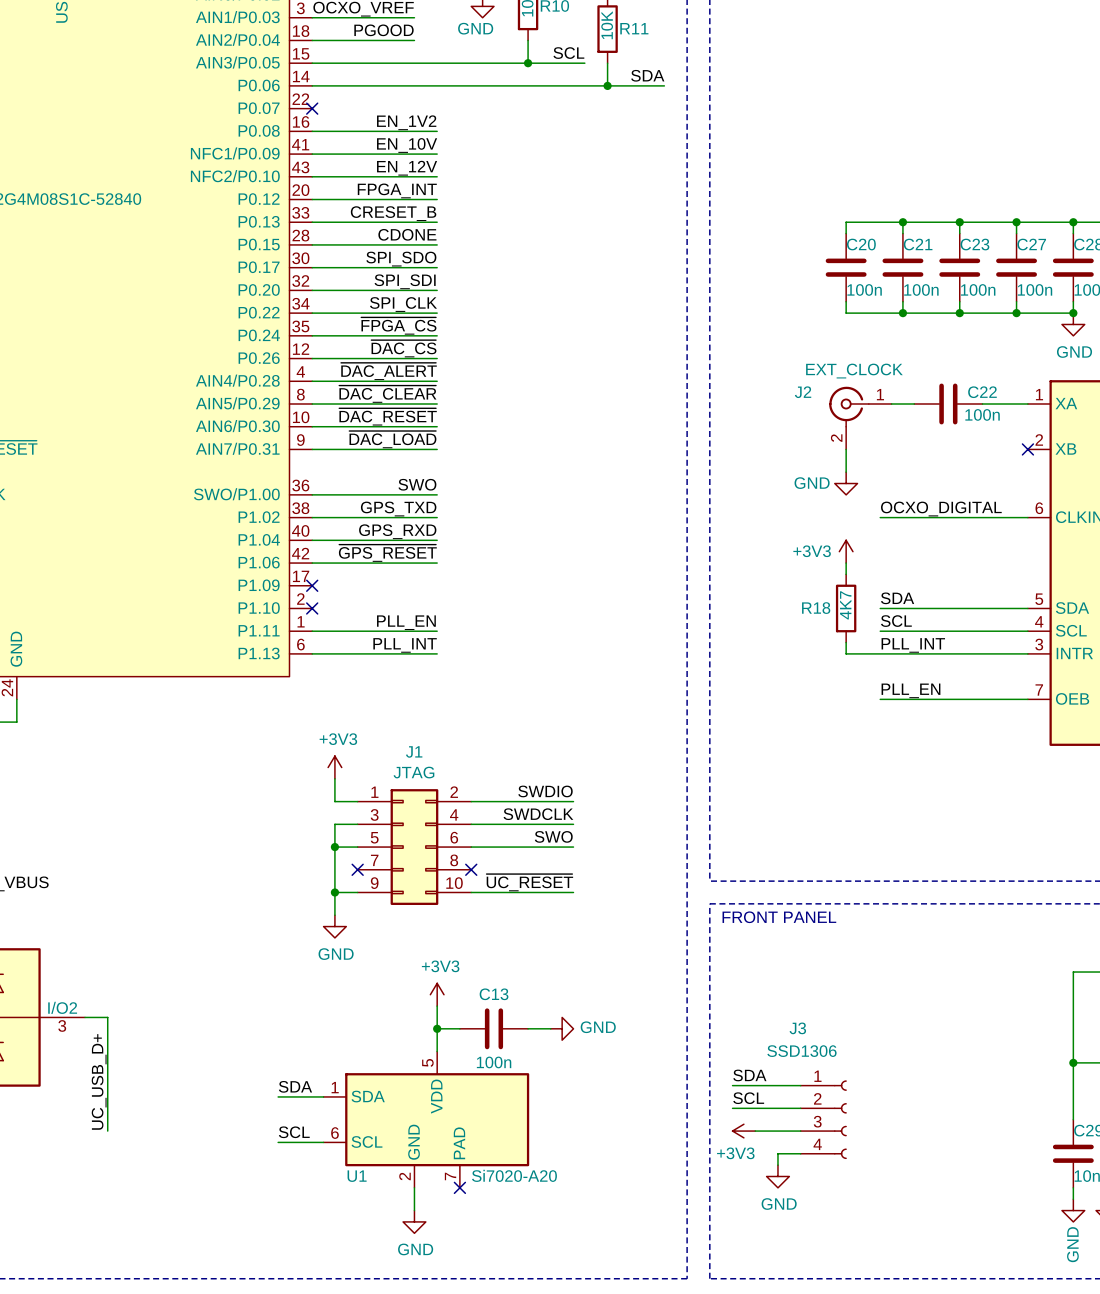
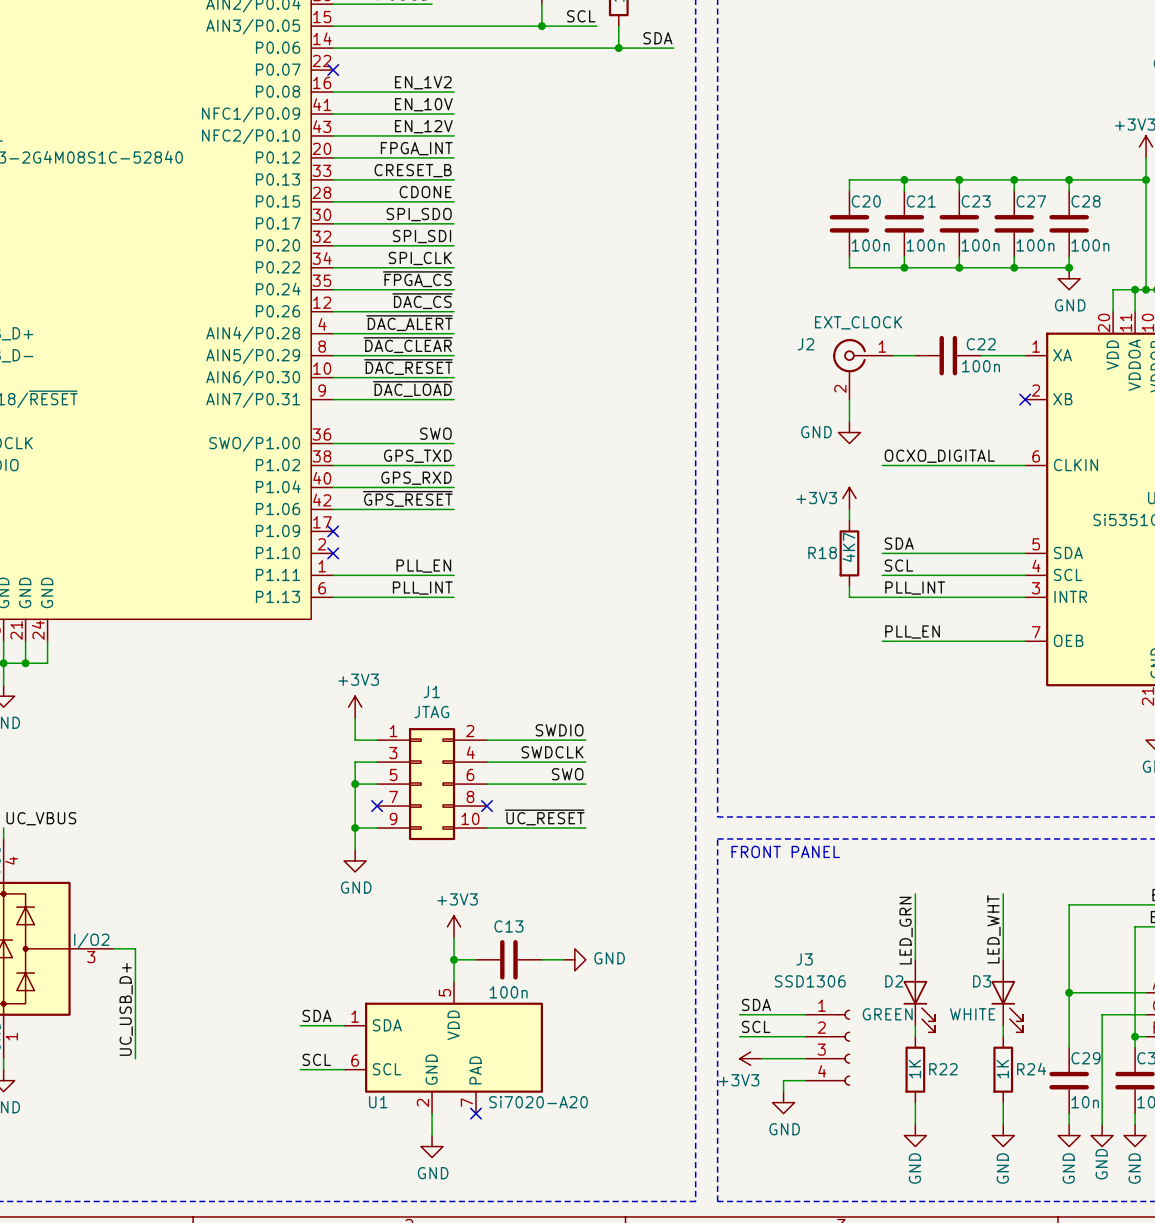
wire: none -> (915, 893) (915, 959)
wire: none -> (1003, 893) (1003, 959)
label: none -> LED_GRN (906, 930)
label: none -> LED_WHT (993, 929)
D2: none -> GREEN (919, 996)
D3: none -> WHITE (1007, 996)
wire: none -> (915, 1025) (915, 1036)
wire: none -> (1003, 1025) (1003, 1036)
R22: none -> 1K (915, 1069)
R24: none -> 1K (1003, 1069)
wire: none -> (915, 1102) (915, 1124)
wire: none -> (1003, 1102) (1003, 1124)
power symbol: none -> GND (915, 1135)
power symbol: none -> GND (1003, 1135)

